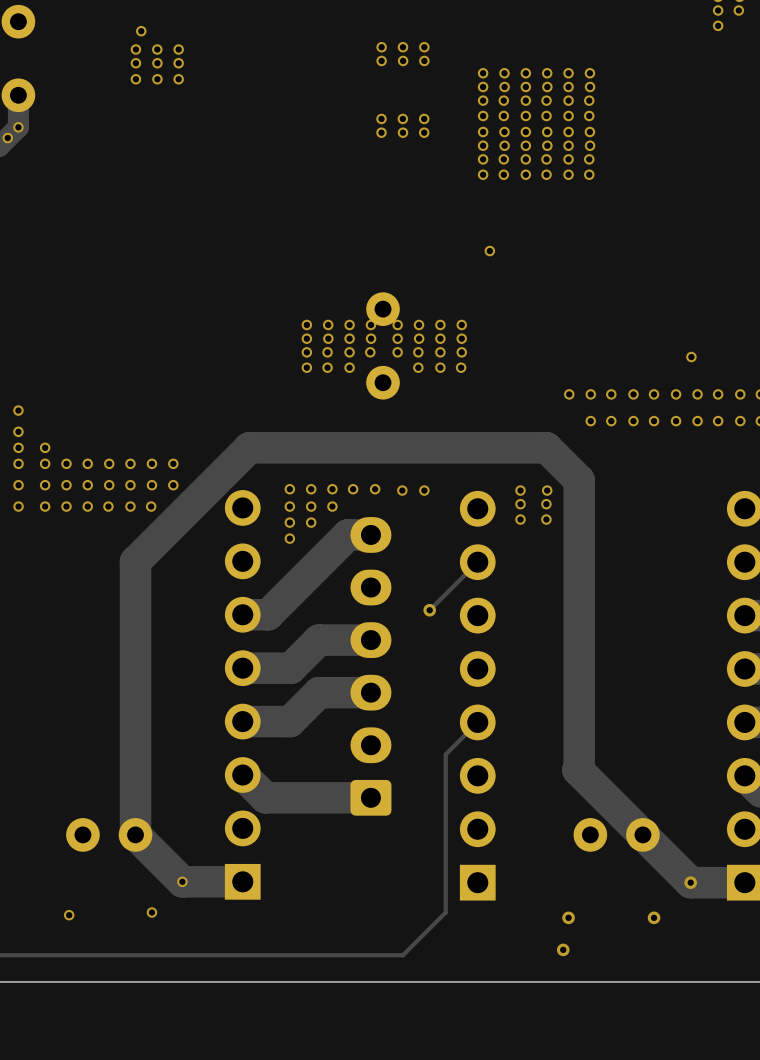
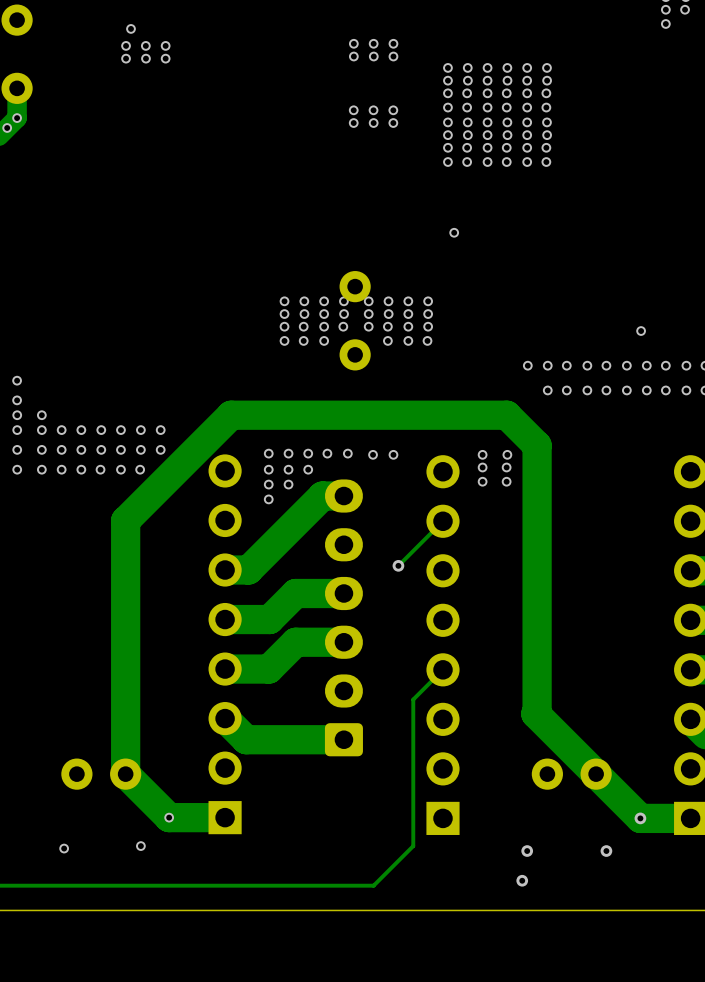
via: (135, 79) -> none
via: (157, 79) -> none
via: (178, 79) -> none

